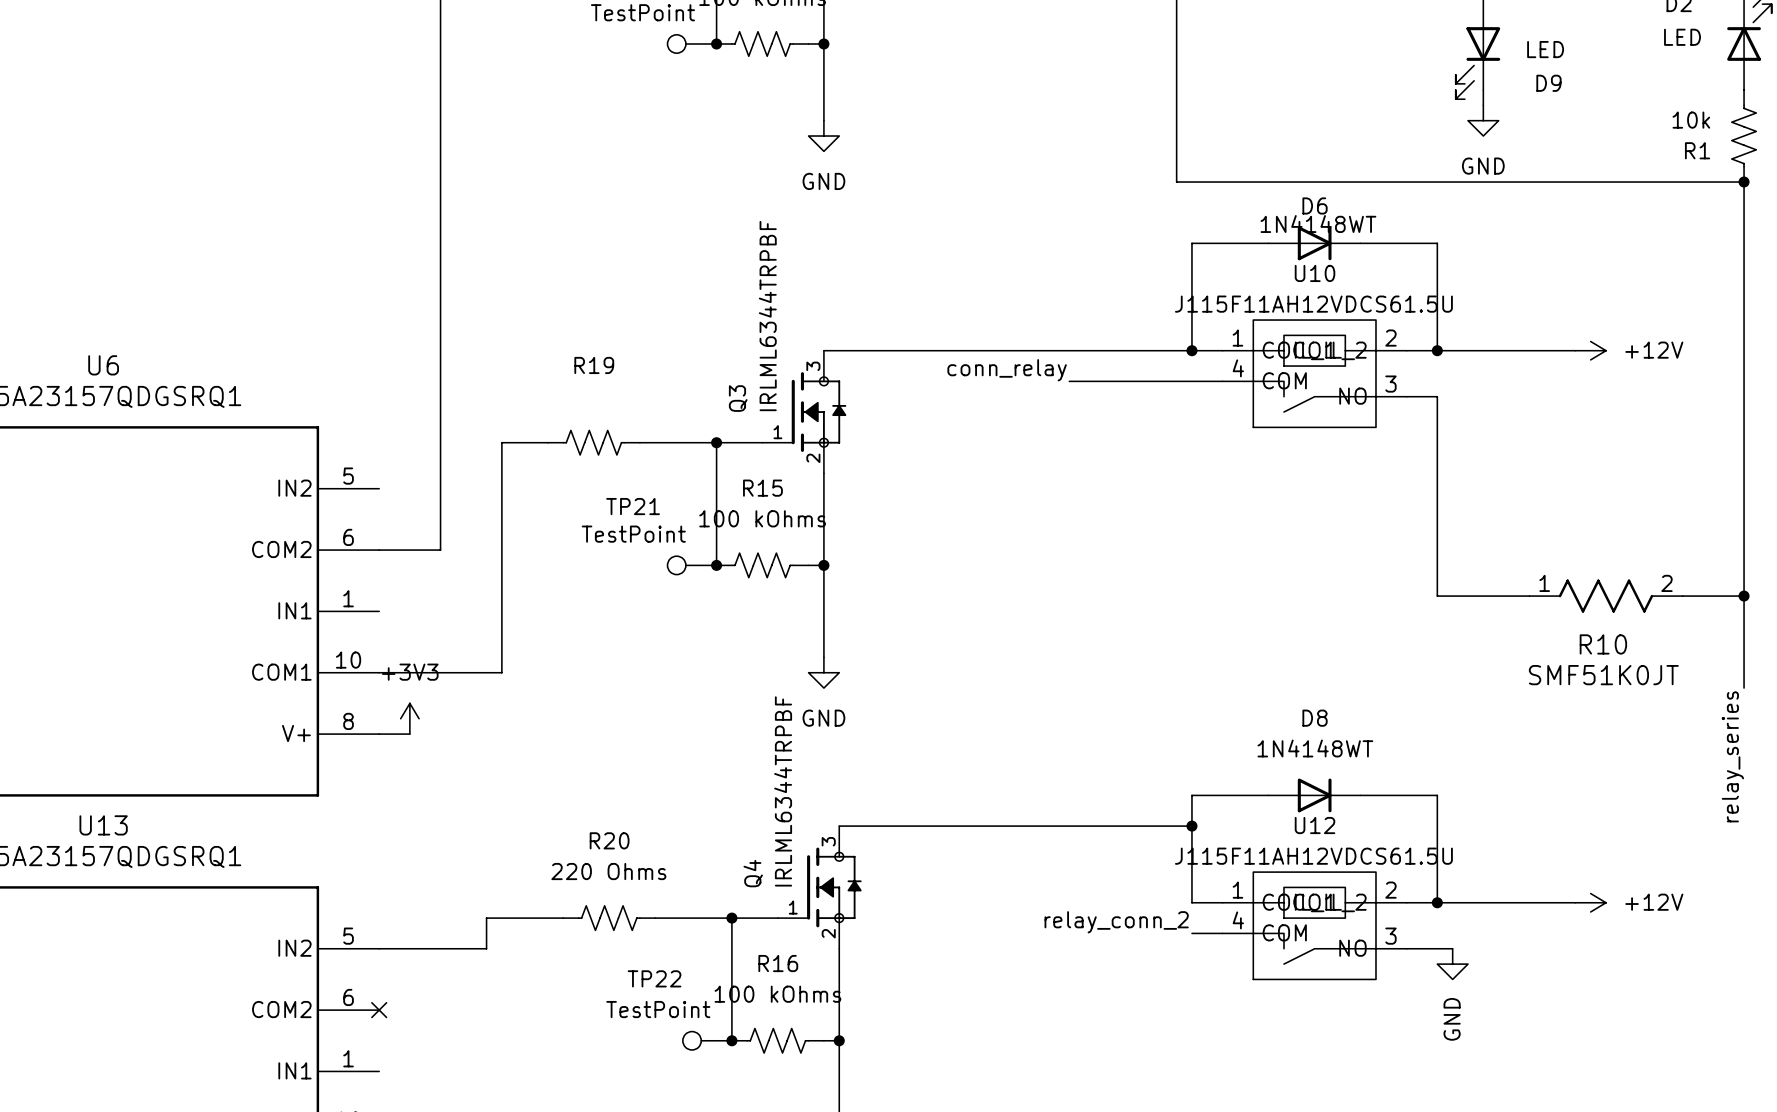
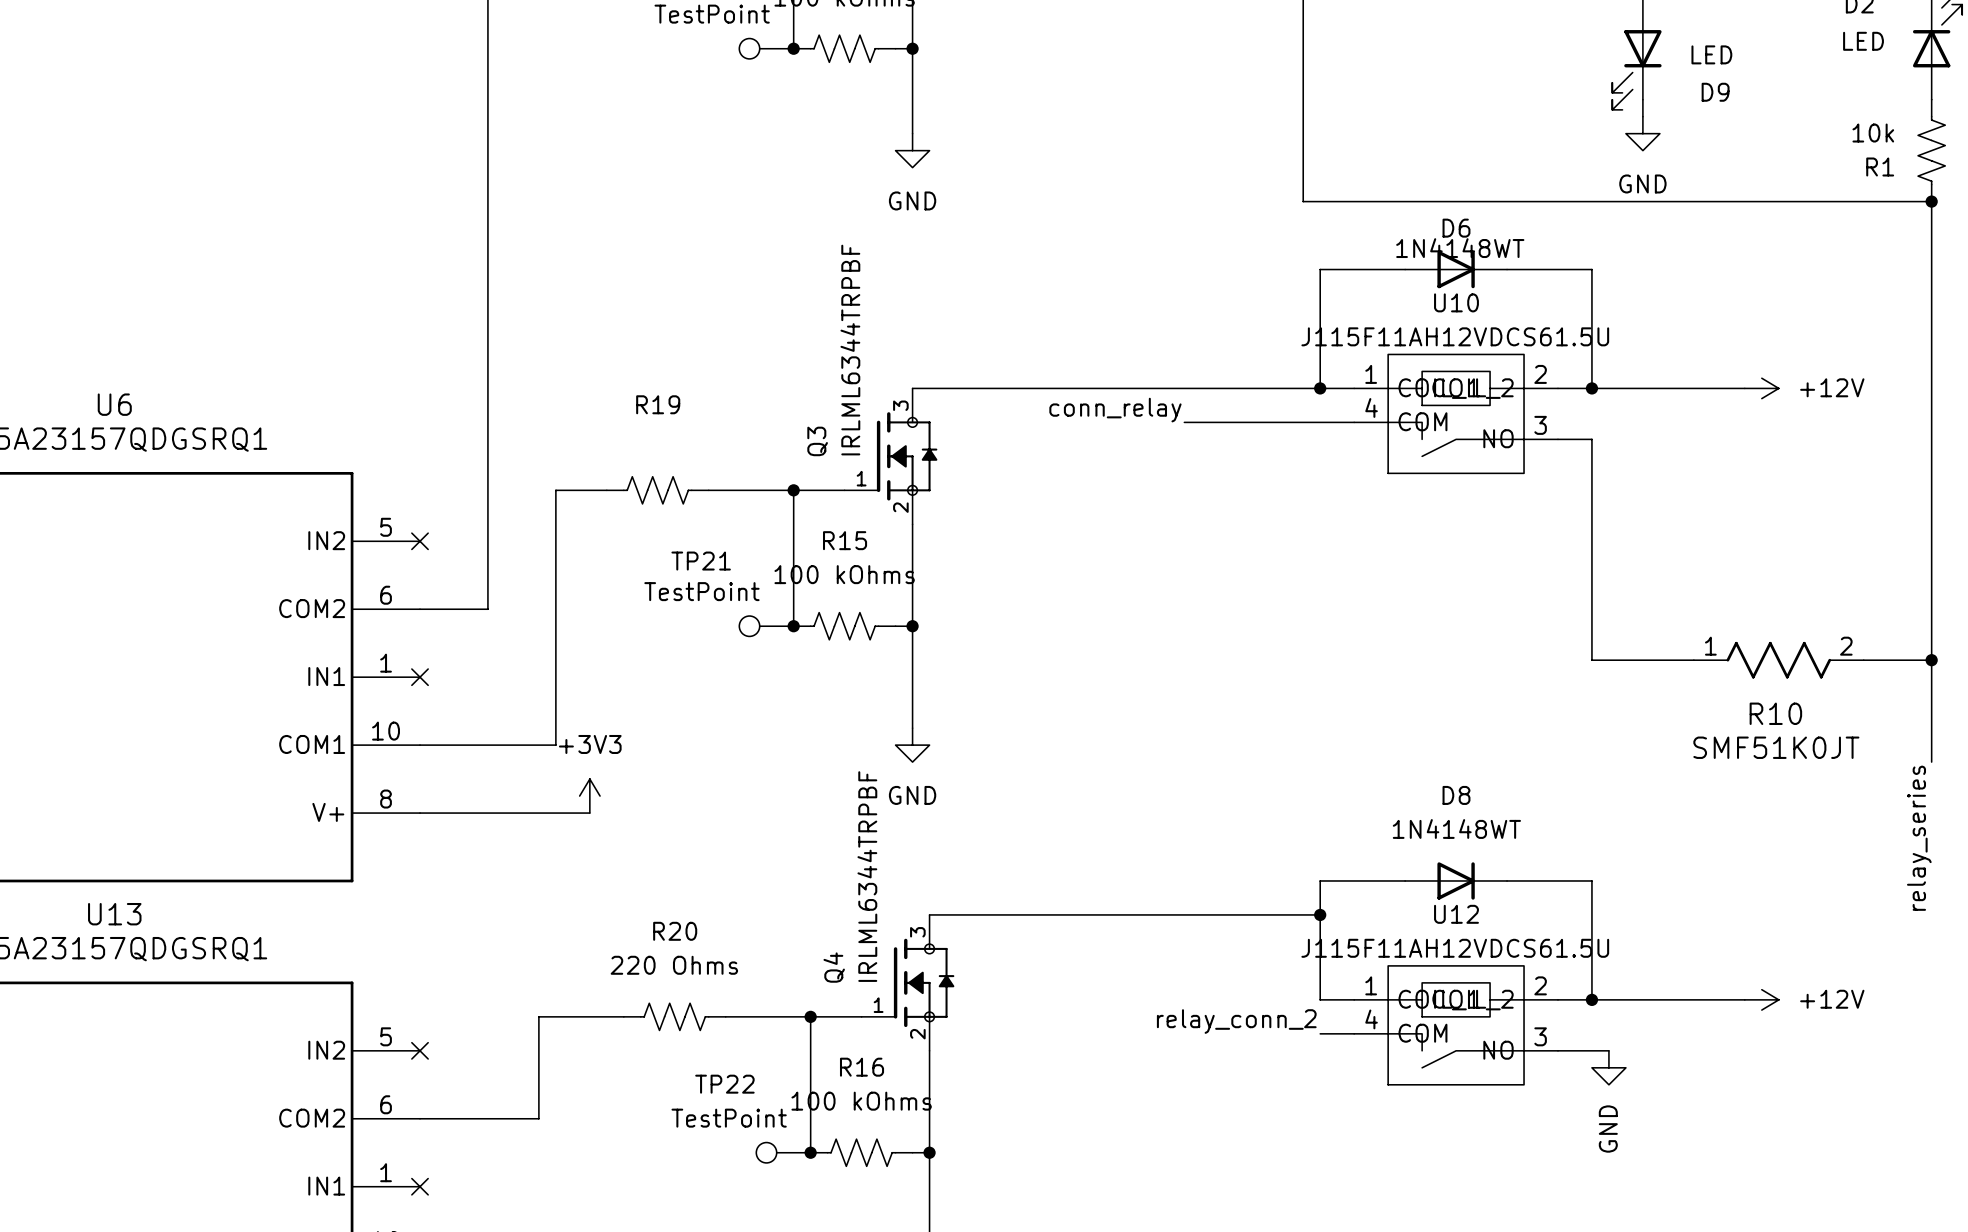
no-connect mark: none -> (420, 541)
no-connect mark: none -> (420, 677)
power symbol position: +3V3 (409, 718) -> +3V3 (589, 796)
wire: none -> (453, 813) (589, 813)
wire: (379, 948) (486, 948) -> (420, 1118) (538, 1118) (538, 1050)
no-connect mark: none -> (420, 1050)
no-connect mark: (379, 1010) -> none
no-connect mark: none -> (420, 1186)

